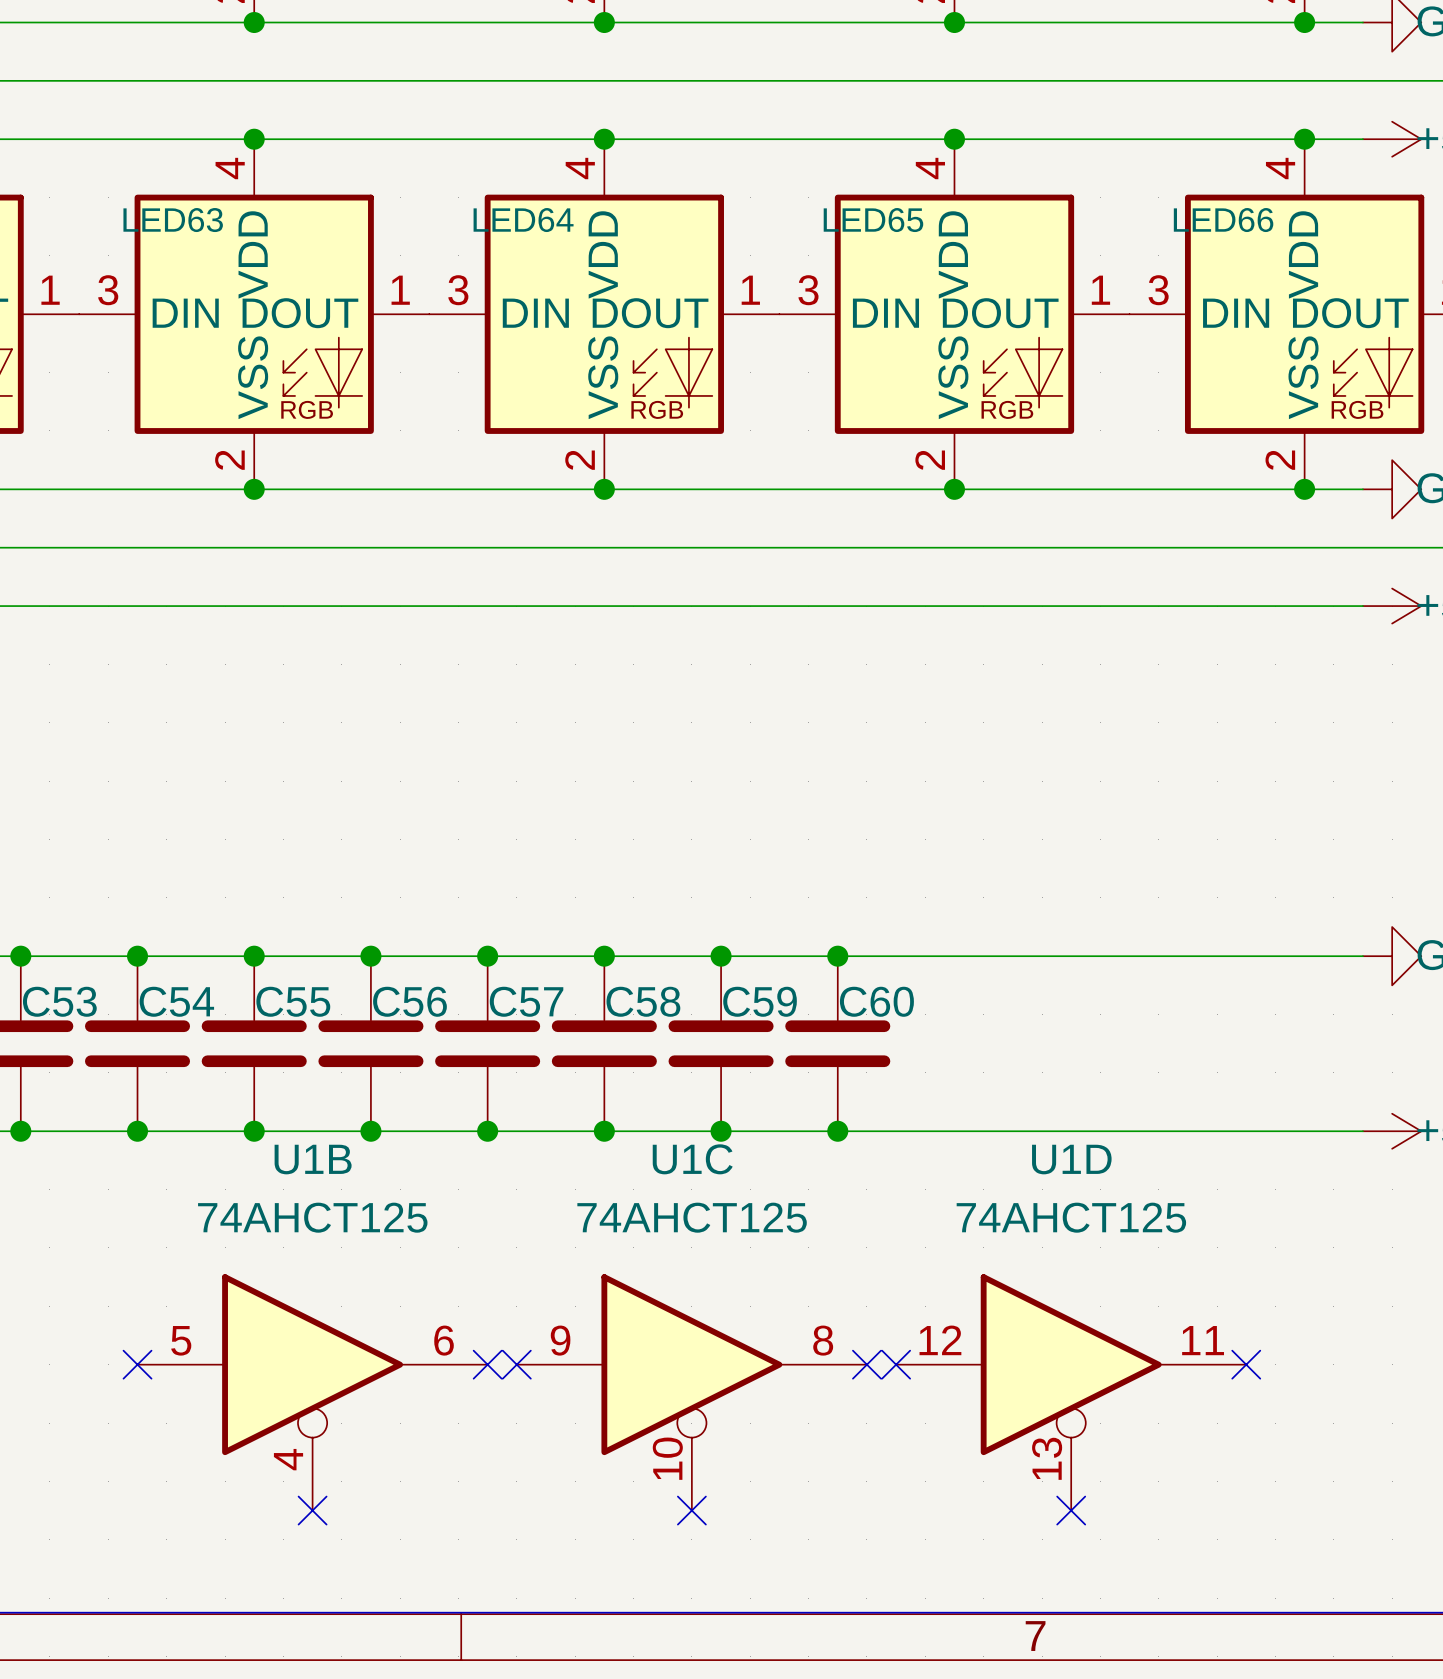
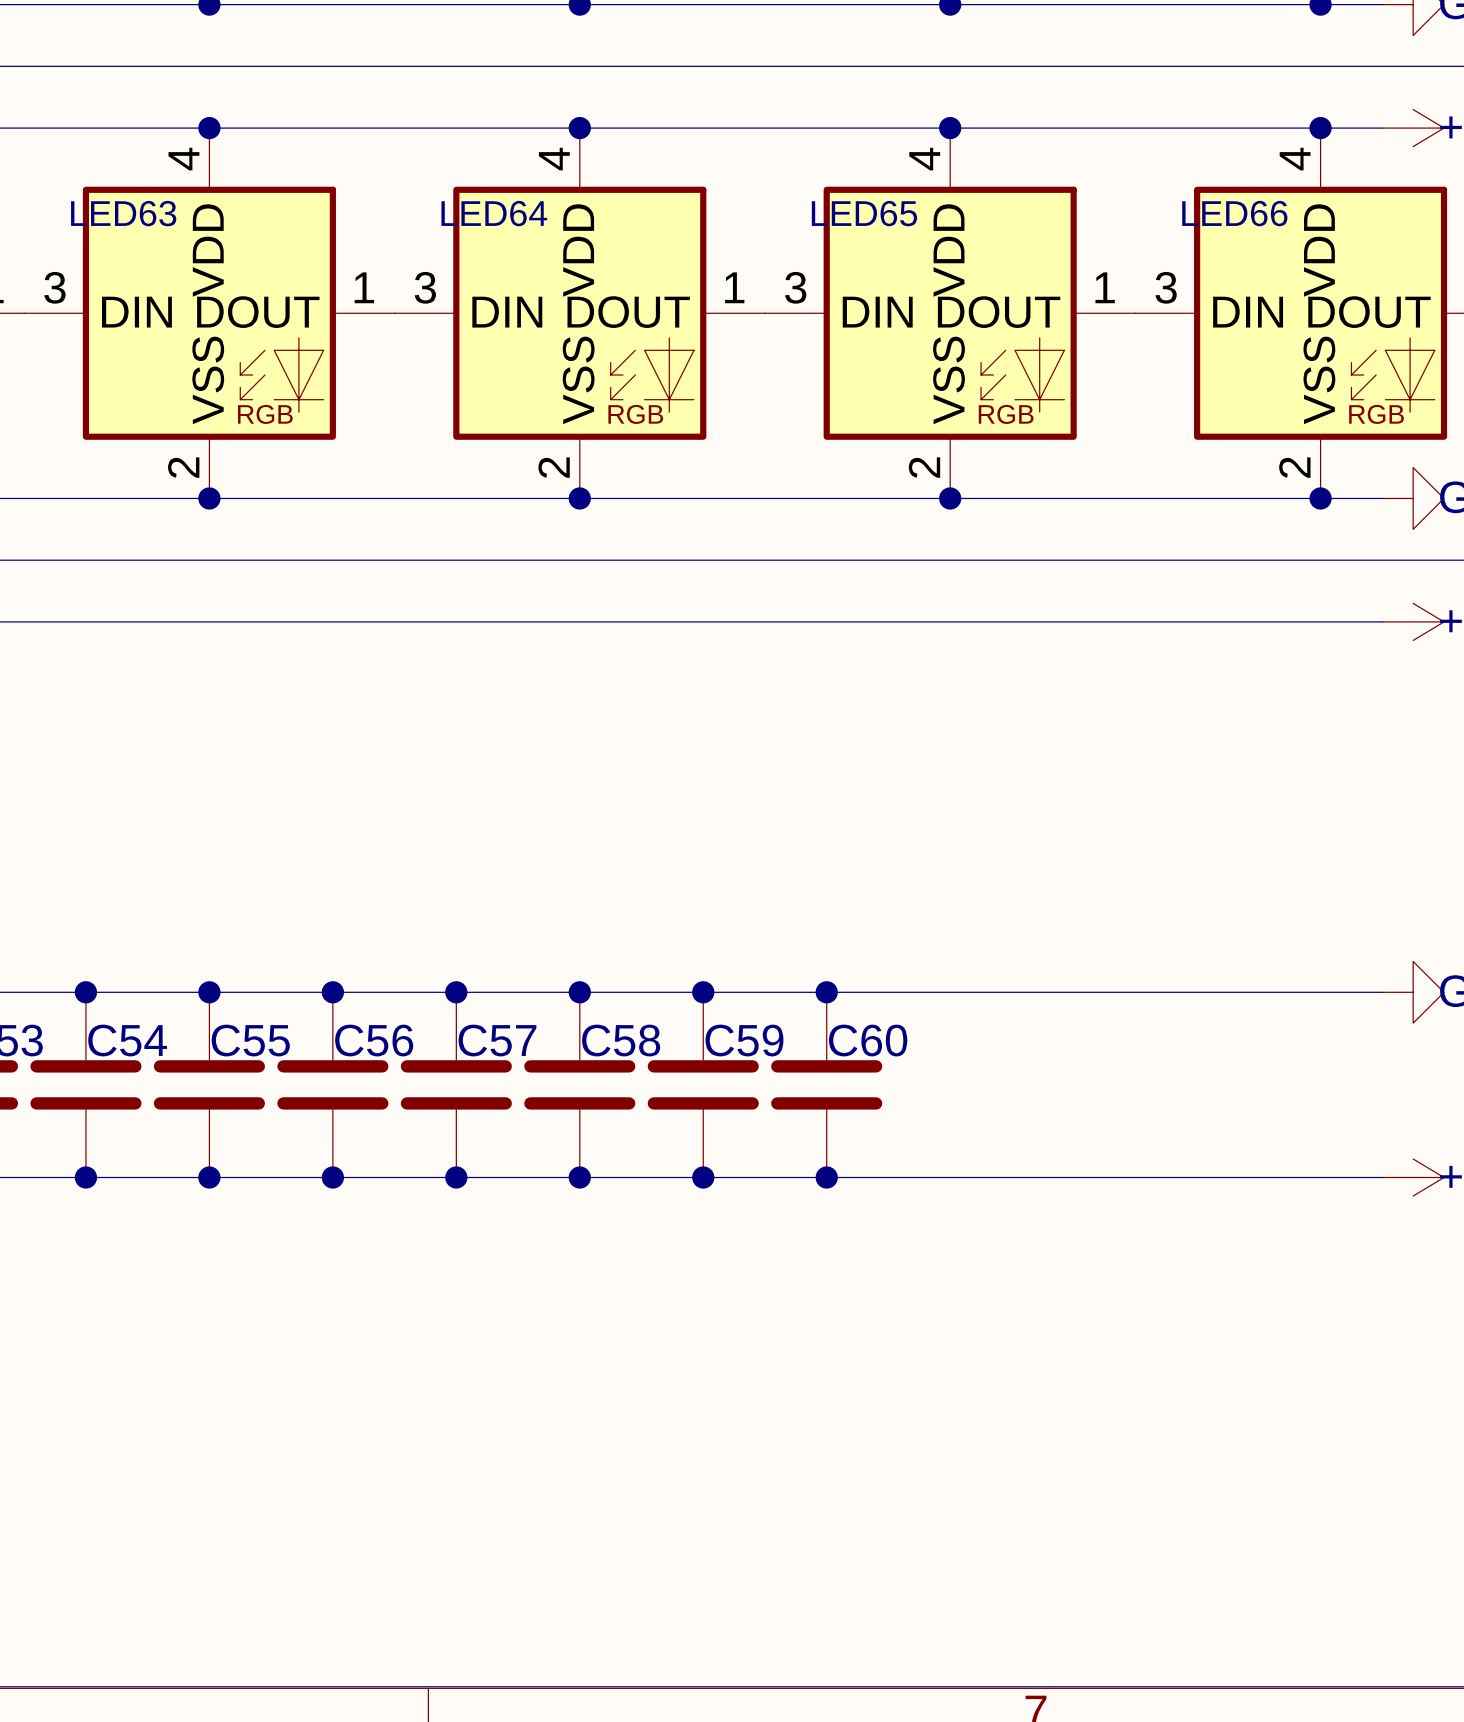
no-connect mark: (137, 1364) -> none
no-connect mark: (487, 1364) -> none
no-connect mark: (516, 1364) -> none
no-connect mark: (866, 1364) -> none
no-connect mark: (896, 1364) -> none
no-connect mark: (1246, 1364) -> none
U1B: 74AHCT125 (312, 1392) -> none
U1C: 74AHCT125 (691, 1392) -> none
U1D: 74AHCT125 (1071, 1392) -> none
no-connect mark: (312, 1510) -> none
no-connect mark: (691, 1510) -> none
no-connect mark: (1071, 1510) -> none

